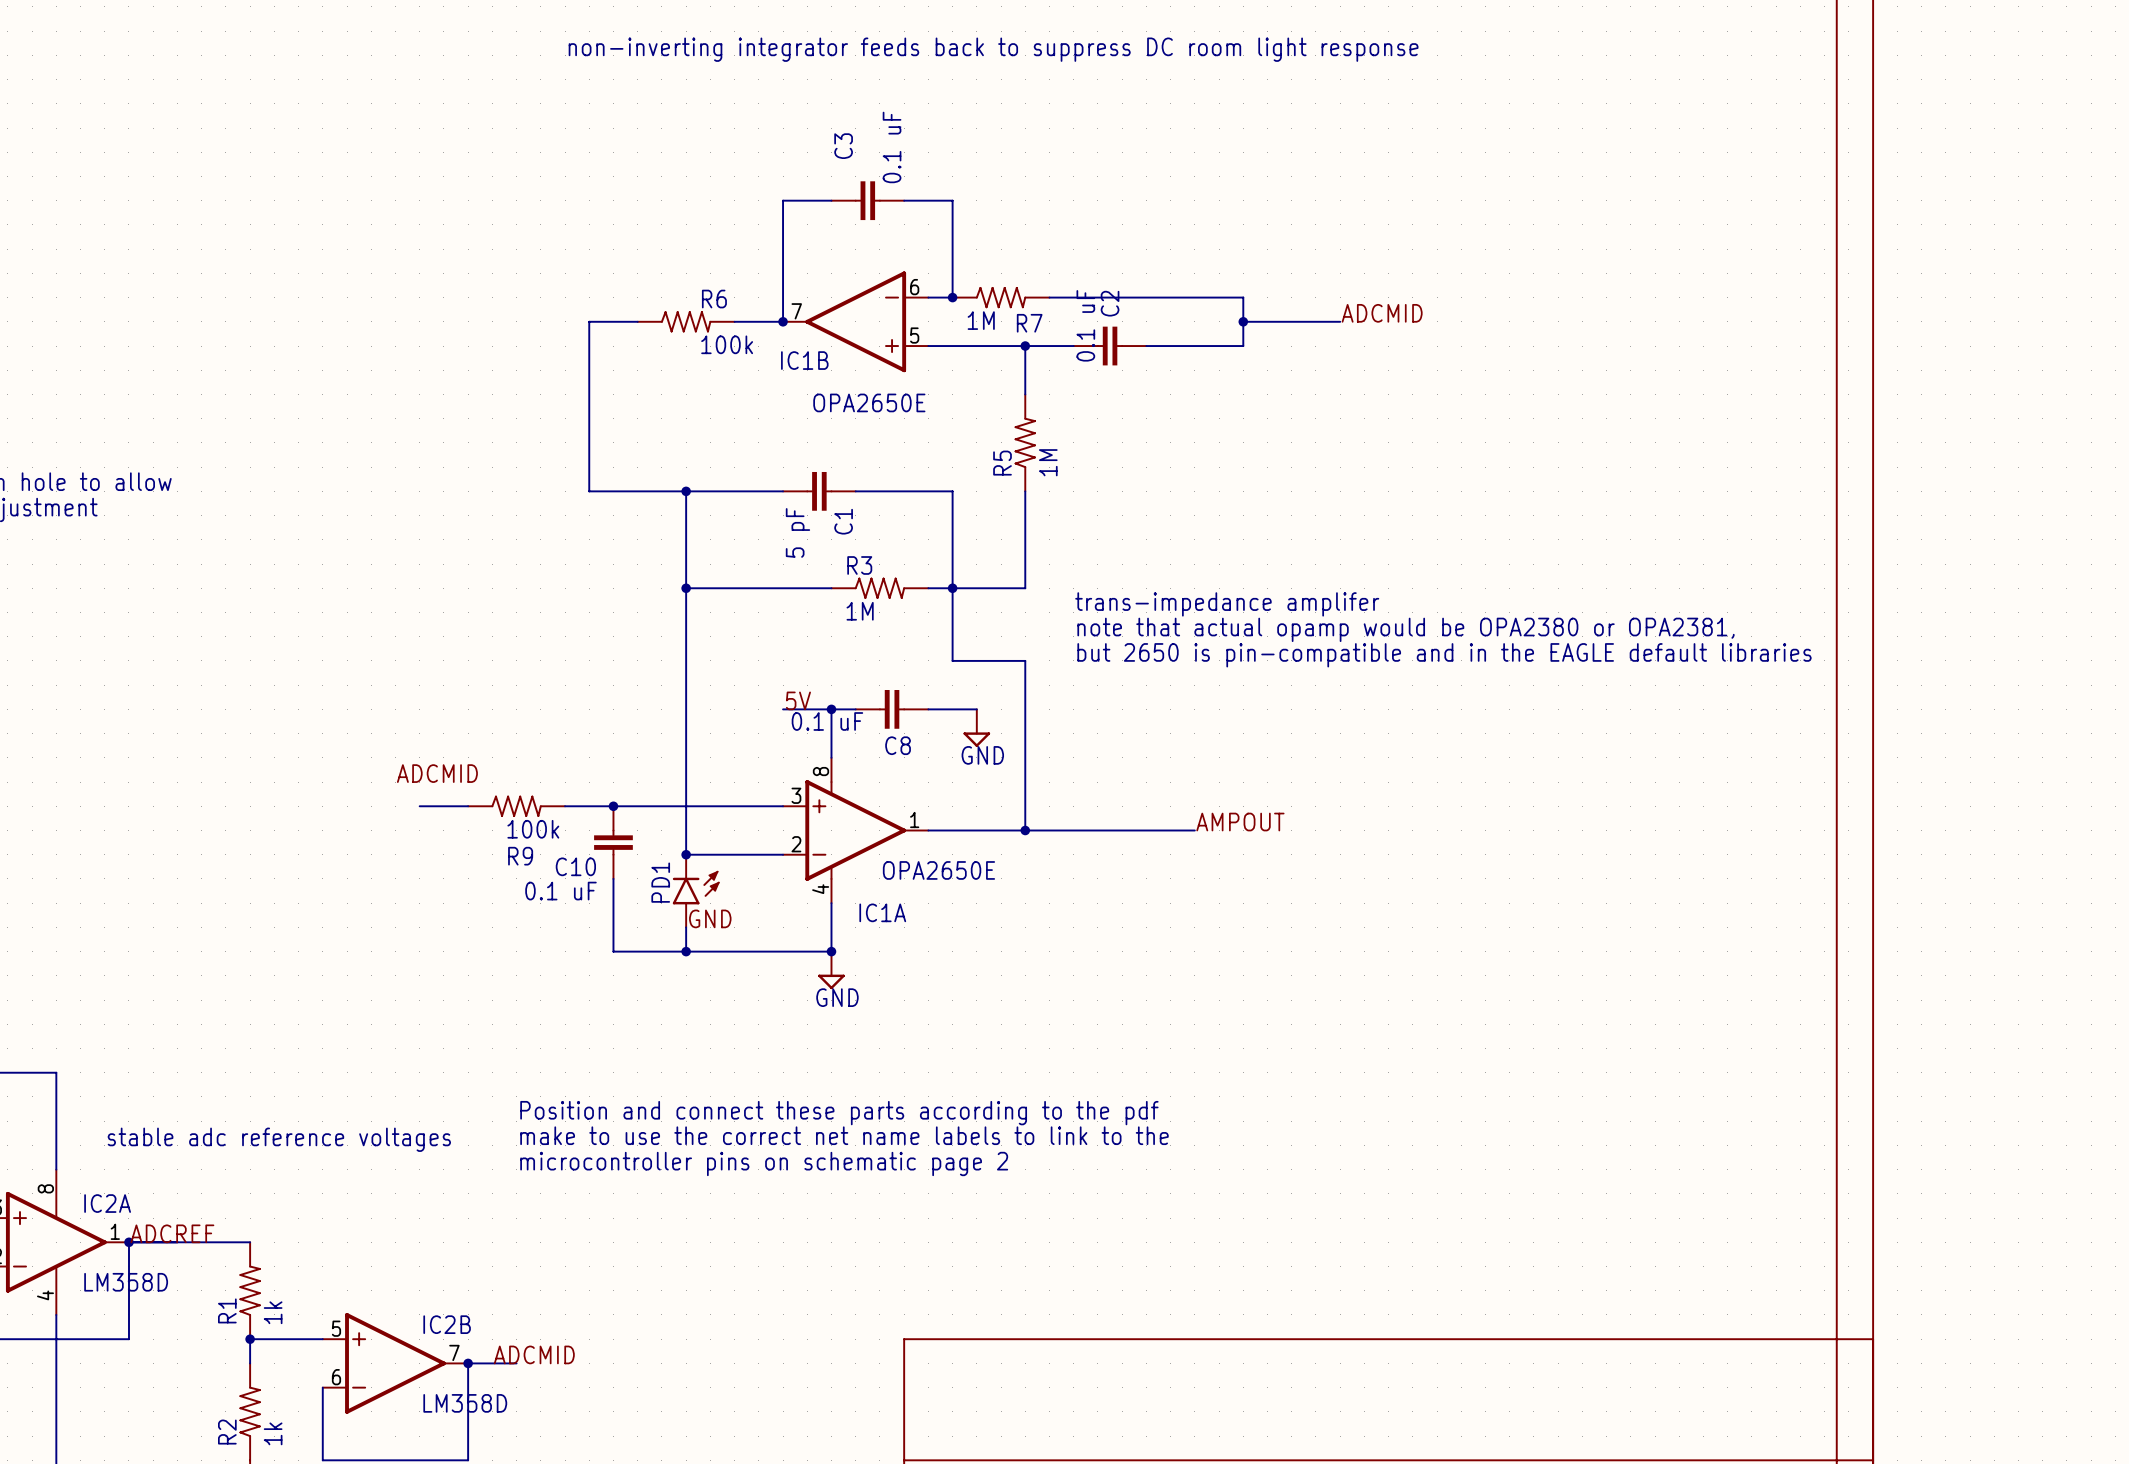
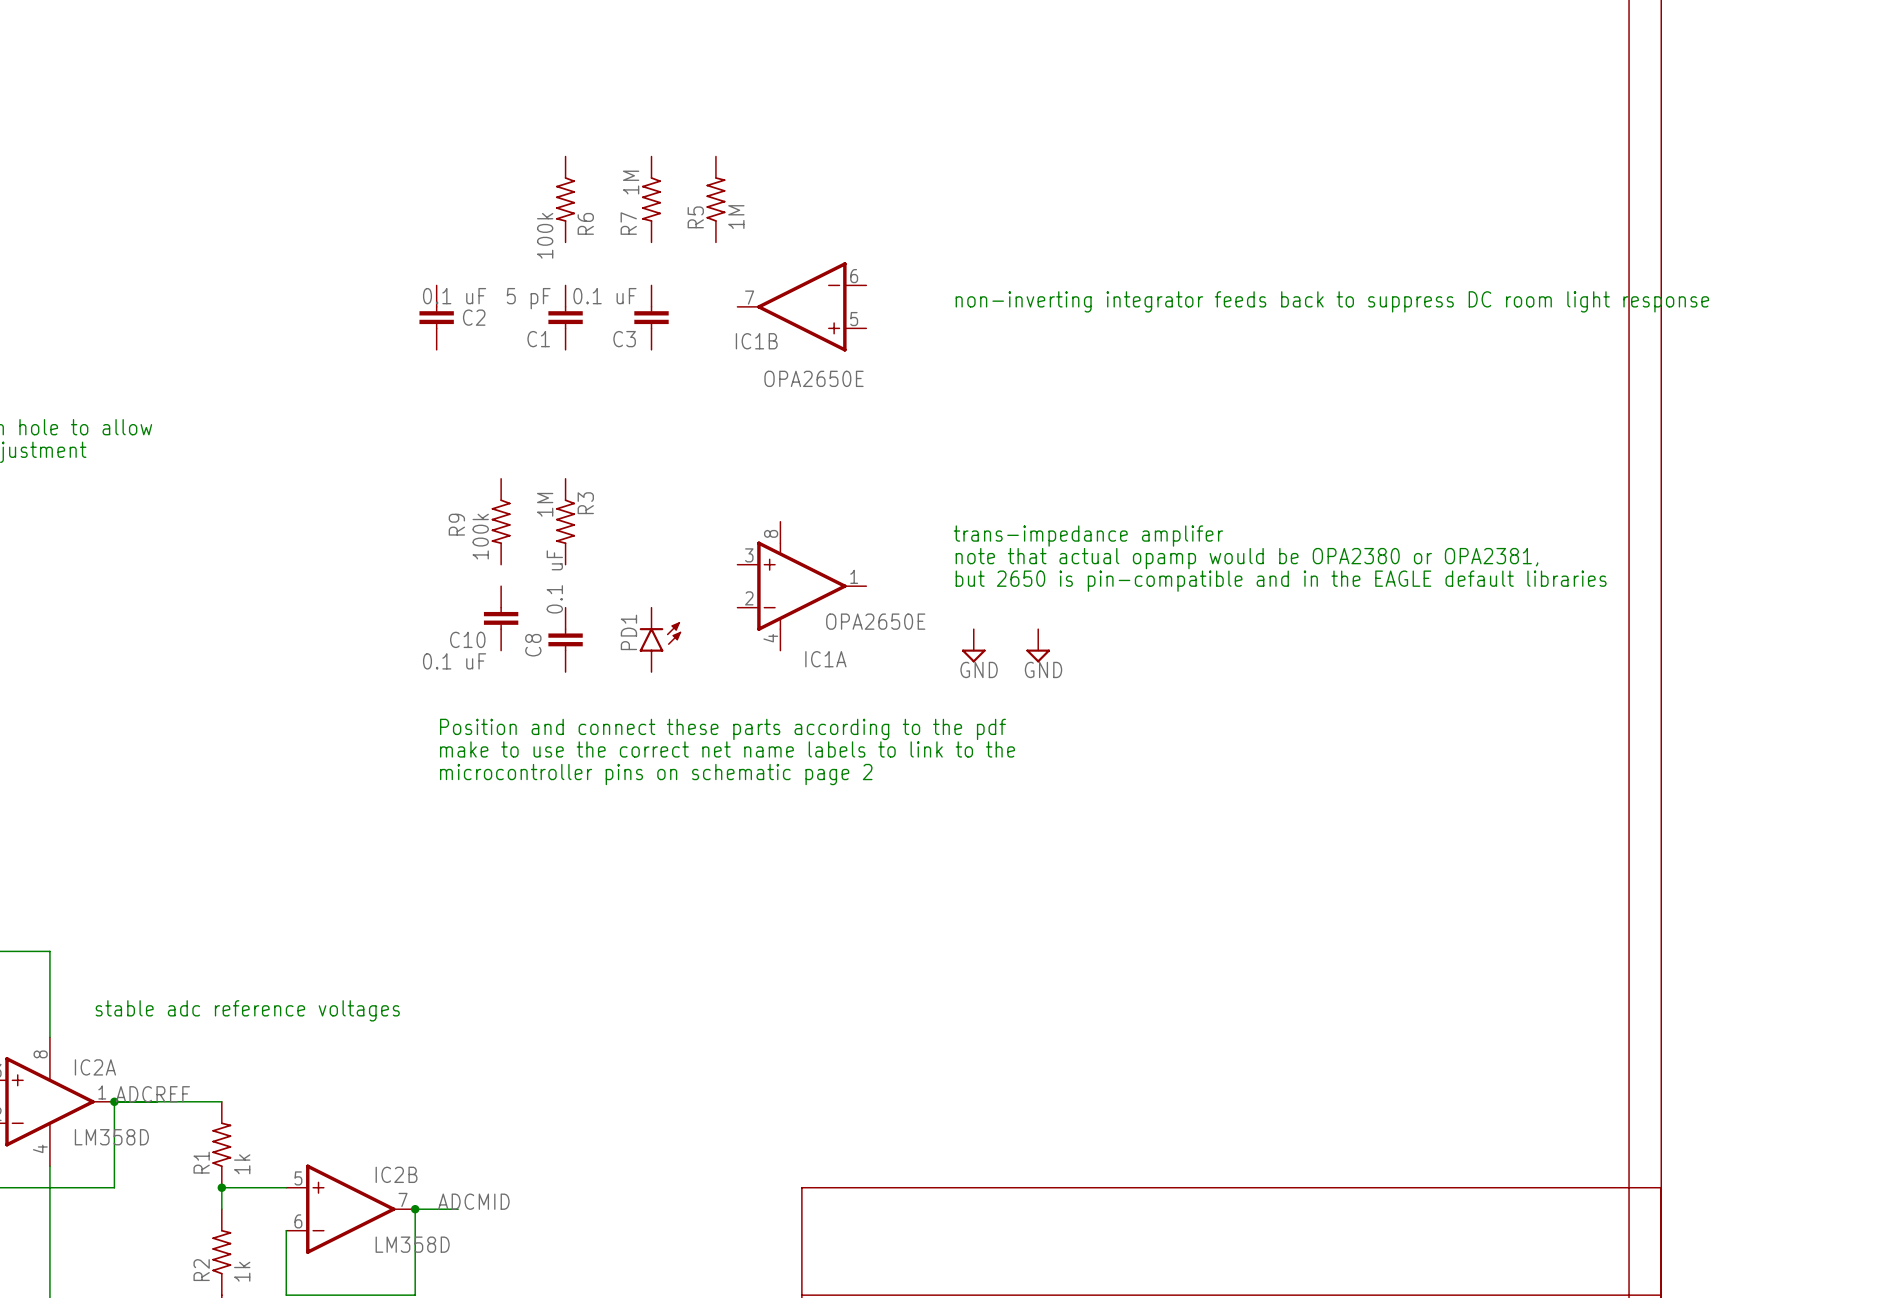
text: non-inverting integrator feeds back to suppress DC room light response (993, 49) -> none
C3 name position: C3 (843, 146) -> C3 (624, 339)
C3 value position: 0.1 uF (892, 147) -> 0.1 uF (604, 296)
wire: (831, 200) (783, 200) (783, 321) (734, 321) -> none
C3 rotation: 0° (867, 200) -> 90° clockwise (651, 317)
C3 position: (867, 200) -> (651, 317)
wire: (904, 200) (952, 200) (952, 297) (928, 297) -> none
junction: (952, 297) -> none
R7 rotation: 0° (1001, 297) -> 90° clockwise (651, 199)
R7 position: (1001, 297) -> (651, 199)
wire: (1049, 297) (1243, 297) (1243, 346) (1146, 346) -> none
label: ADCMID (1382, 313) -> none
wire: (637, 321) (589, 321) (589, 491) (783, 491) -> none
R6 rotation: 0° (686, 321) -> 90° clockwise (565, 199)
R6 position: (686, 321) -> (565, 199)
junction: (783, 321) -> none
IC1B position: (855, 321) -> (801, 306)
wire: (1243, 321) (1340, 321) -> none
junction: (1243, 321) -> none
text: none -> non-inverting integrator feeds back to suppress DC room light response (1332, 301)
wire: (928, 346) (1073, 346) -> none
wire: (1025, 346) (1025, 394) -> none
junction: (1025, 346) -> none
C2 rotation: 0° (1110, 346) -> 90° clockwise (436, 317)
C2 position: (1110, 346) -> (436, 317)
R5 position: (1025, 442) -> (715, 199)
wire: (686, 491) (686, 854) (783, 854) -> none
junction: (686, 491) -> none
C1 rotation: 0° (819, 491) -> 90° clockwise (565, 317)
C1 position: (819, 491) -> (565, 317)
wire: (855, 491) (952, 491) (952, 660) (1025, 660) (1025, 830) -> none
wire: (1025, 491) (1025, 588) (928, 588) -> none
wire: (686, 588) (831, 588) -> none
junction: (686, 588) -> none
R3 rotation: 0° (879, 588) -> 90° clockwise (565, 521)
R3 position: (879, 588) -> (565, 521)
junction: (952, 588) -> none
label: 5V (798, 700) -> none
wire: (783, 709) (855, 709) -> none
wire: (831, 709) (831, 757) -> none
junction: (831, 709) -> none
C8 rotation: 0° (892, 709) -> 90° clockwise (565, 639)
C8 position: (892, 709) -> (565, 639)
wire: (928, 709) (976, 709) -> none
power symbol: GND (976, 728) -> none
power symbol: none -> GND (973, 645)
power symbol: none -> GND (1038, 645)
label: ADCMID (437, 773) -> none
wire: (419, 806) (468, 806) -> none
R9 rotation: 0° (516, 806) -> 90° clockwise (501, 521)
R9 position: (516, 806) -> (501, 521)
wire: (565, 806) (783, 806) -> none
junction: (613, 806) -> none
text: none -> Position and connect these parts according to the pdf (722, 729)
label: AMPOUT (1240, 822) -> none
IC1A position: (855, 830) -> (801, 586)
wire: (928, 830) (1194, 830) -> none
junction: (1025, 830) -> none
C10 position: (613, 842) -> (501, 618)
text: none -> make to use the correct net name labels to link to the (727, 749)
junction: (686, 854) -> none
text: none -> microcontroller pins on schematic page 2 (656, 774)
wire: (613, 878) (613, 951) (831, 951) (831, 903) -> none
PD1 position: (696, 891) -> (660, 639)
label: GND (710, 918) -> none
wire: (686, 927) (686, 951) -> none
junction: (686, 951) -> none
junction: (831, 951) -> none
power symbol: GND (831, 970) -> none
text: Position and connect these parts according to the pdf (839, 1113) -> none
text: make to use the correct net name labels to link to the (844, 1135) -> none
text: microcontroller pins on schematic page 2 (764, 1163) -> none

